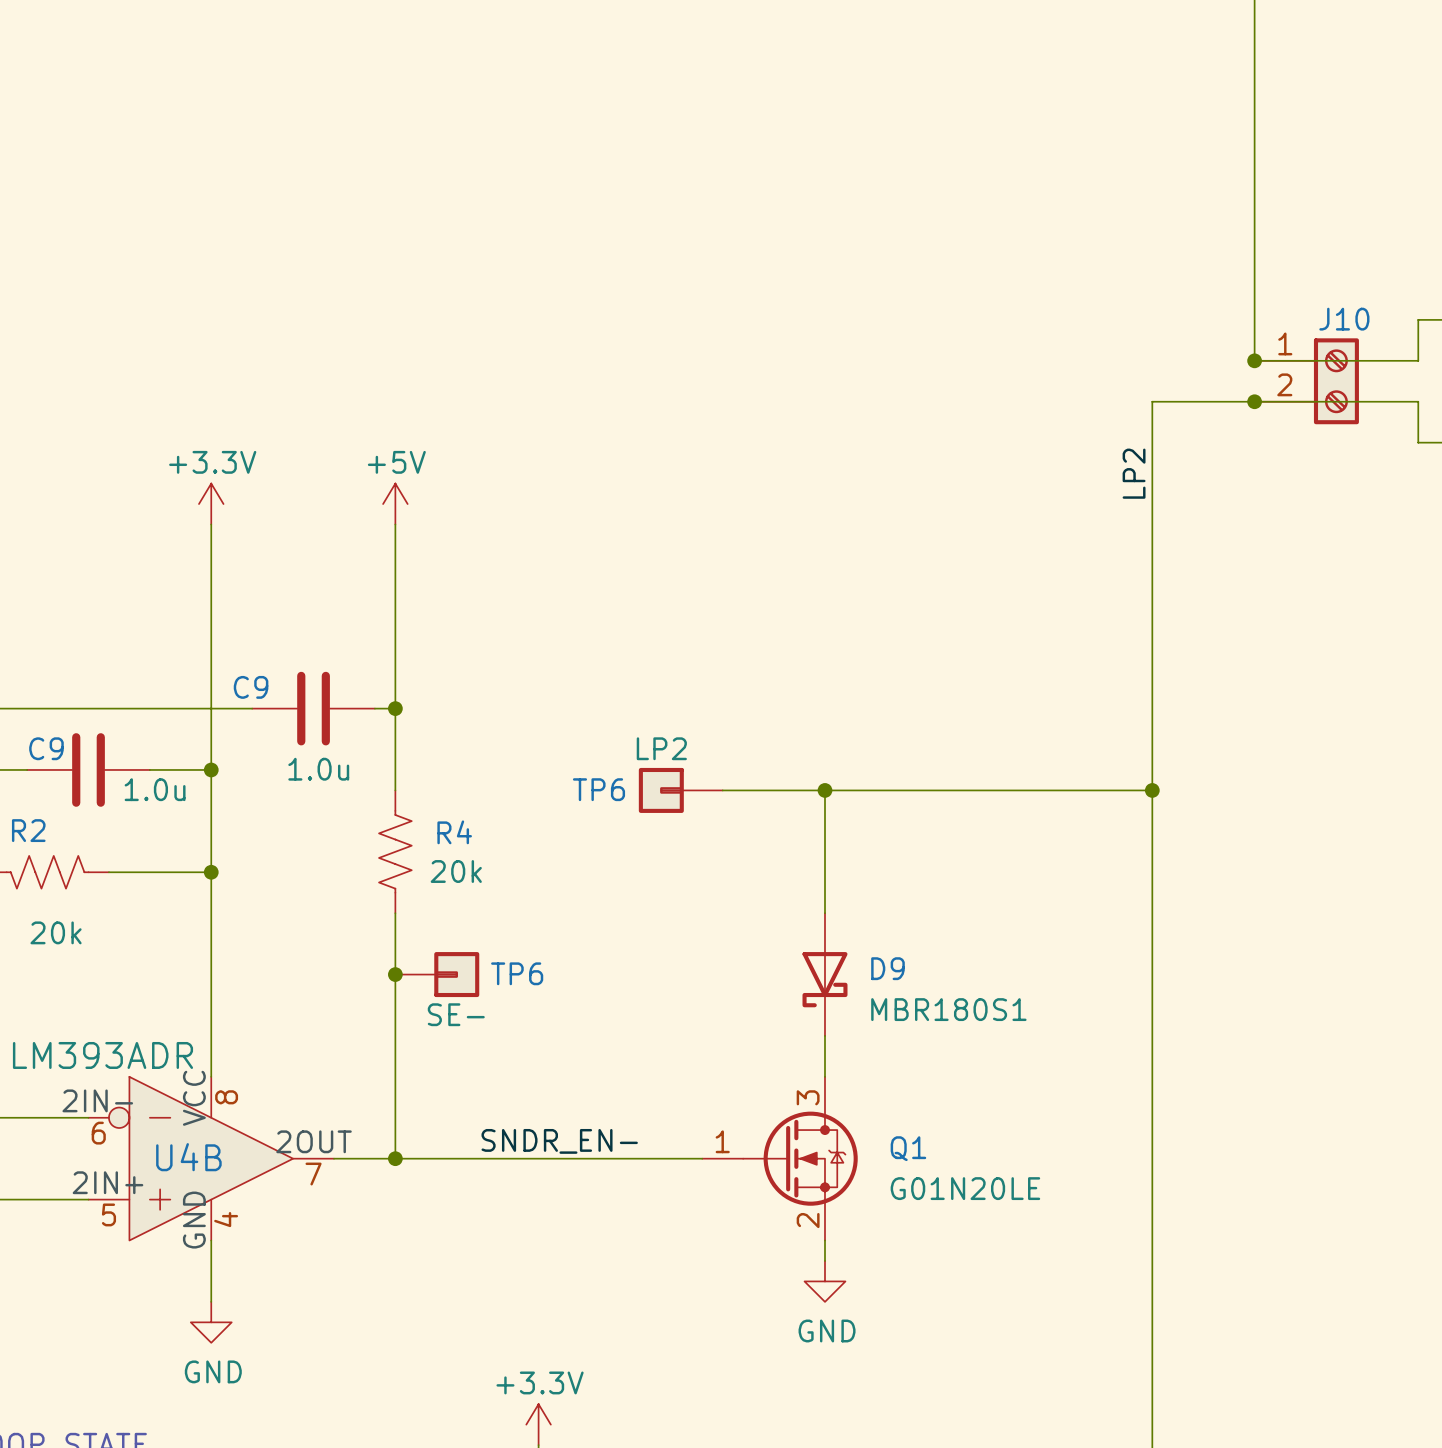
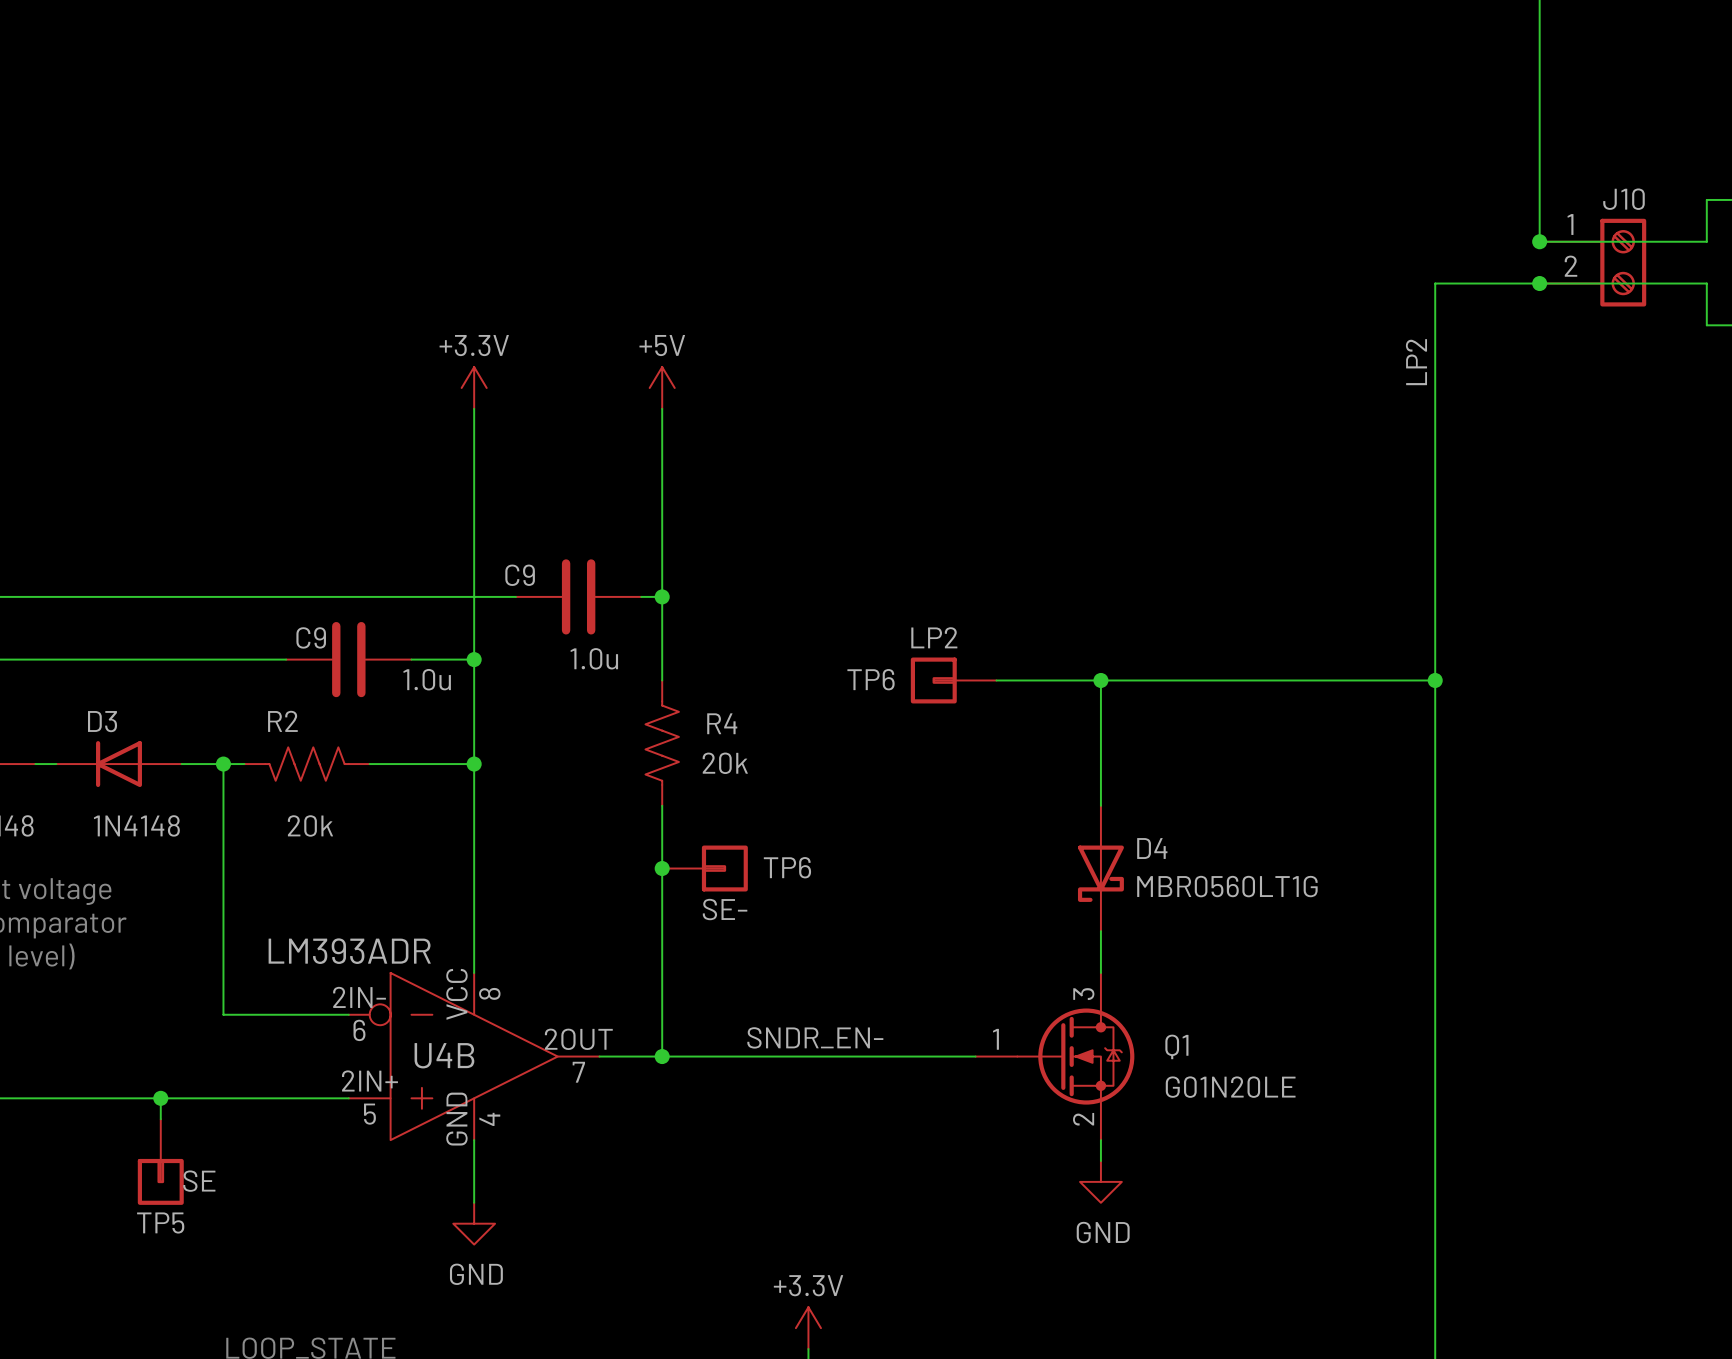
D9 name: D9 (887, 968) -> D4 (1152, 848)
D9 value: MBR180S1 (948, 1009) -> MBR0560LT1G (1227, 886)

